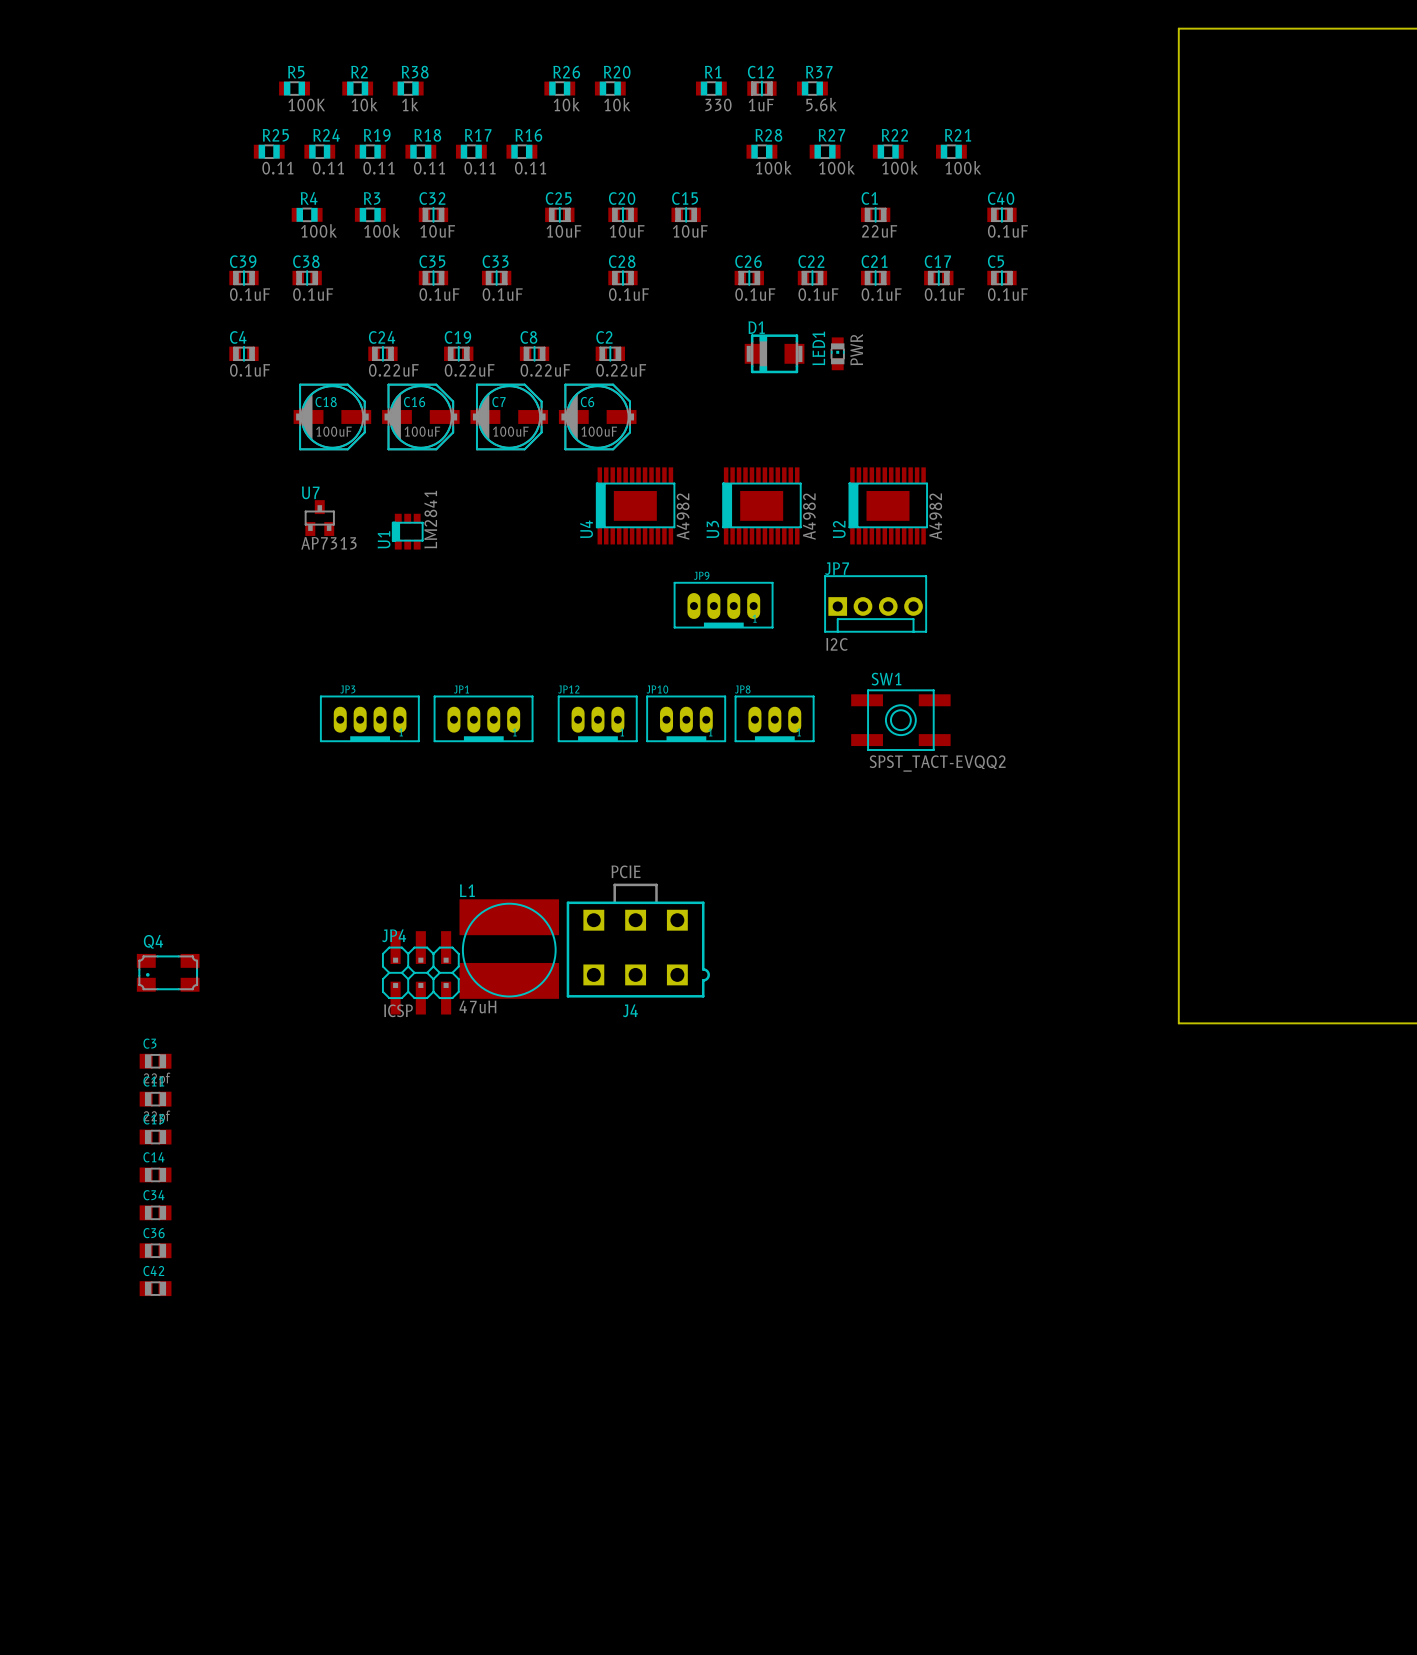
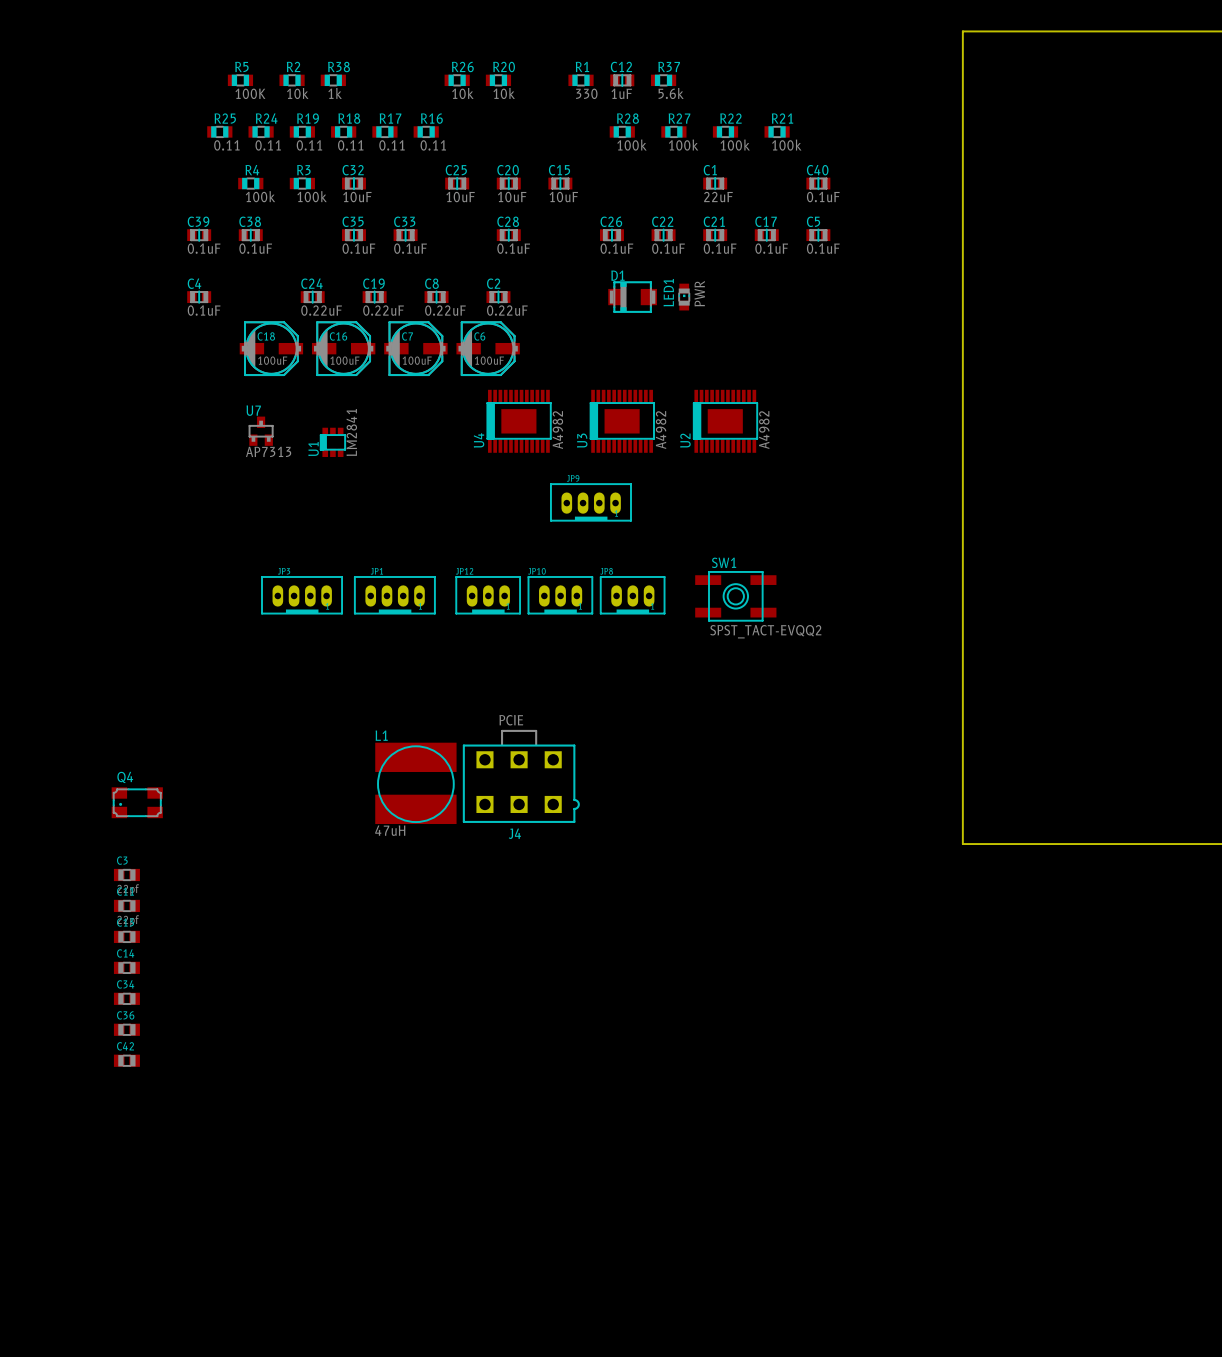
JP7: I2C (875, 603) -> none
JP4: ICSP (420, 972) -> none

